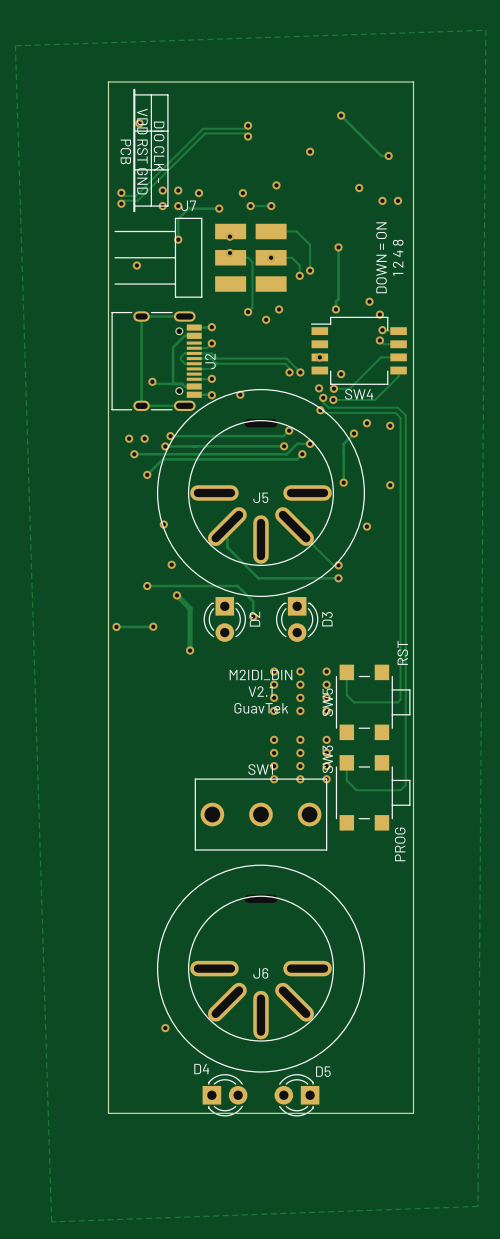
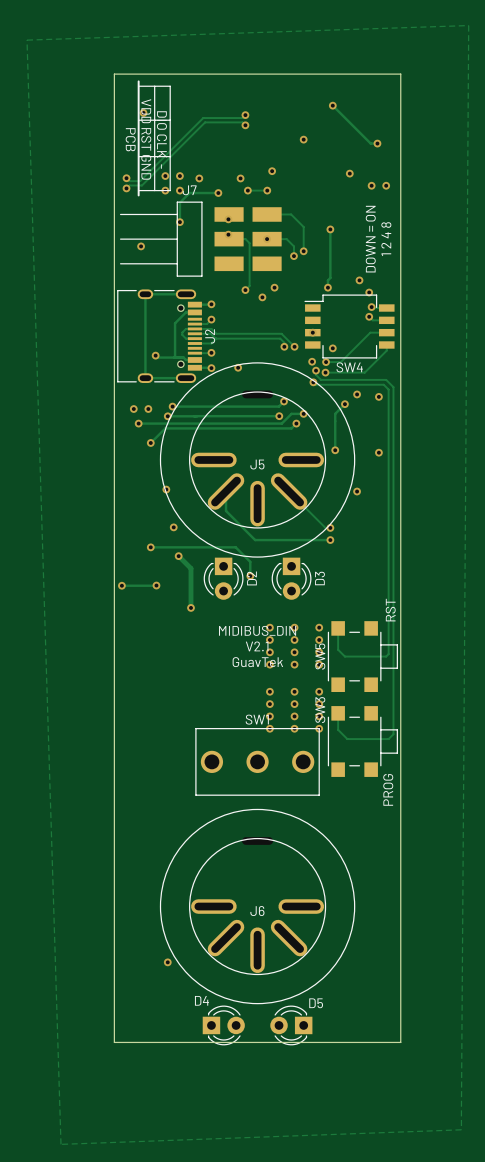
text: M2IDI_DIN (260, 674) -> MIDIBUS_DIN (257, 630)

